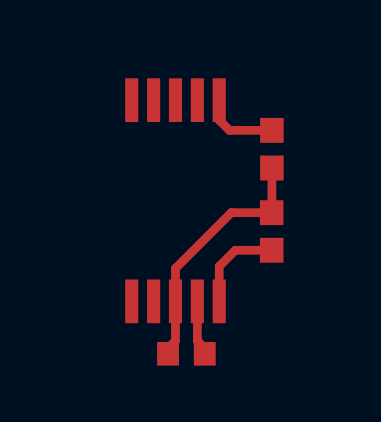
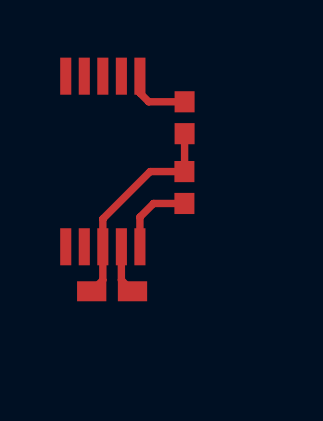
part footprint: [157, 342, 216, 366] -> [77, 281, 148, 302]

